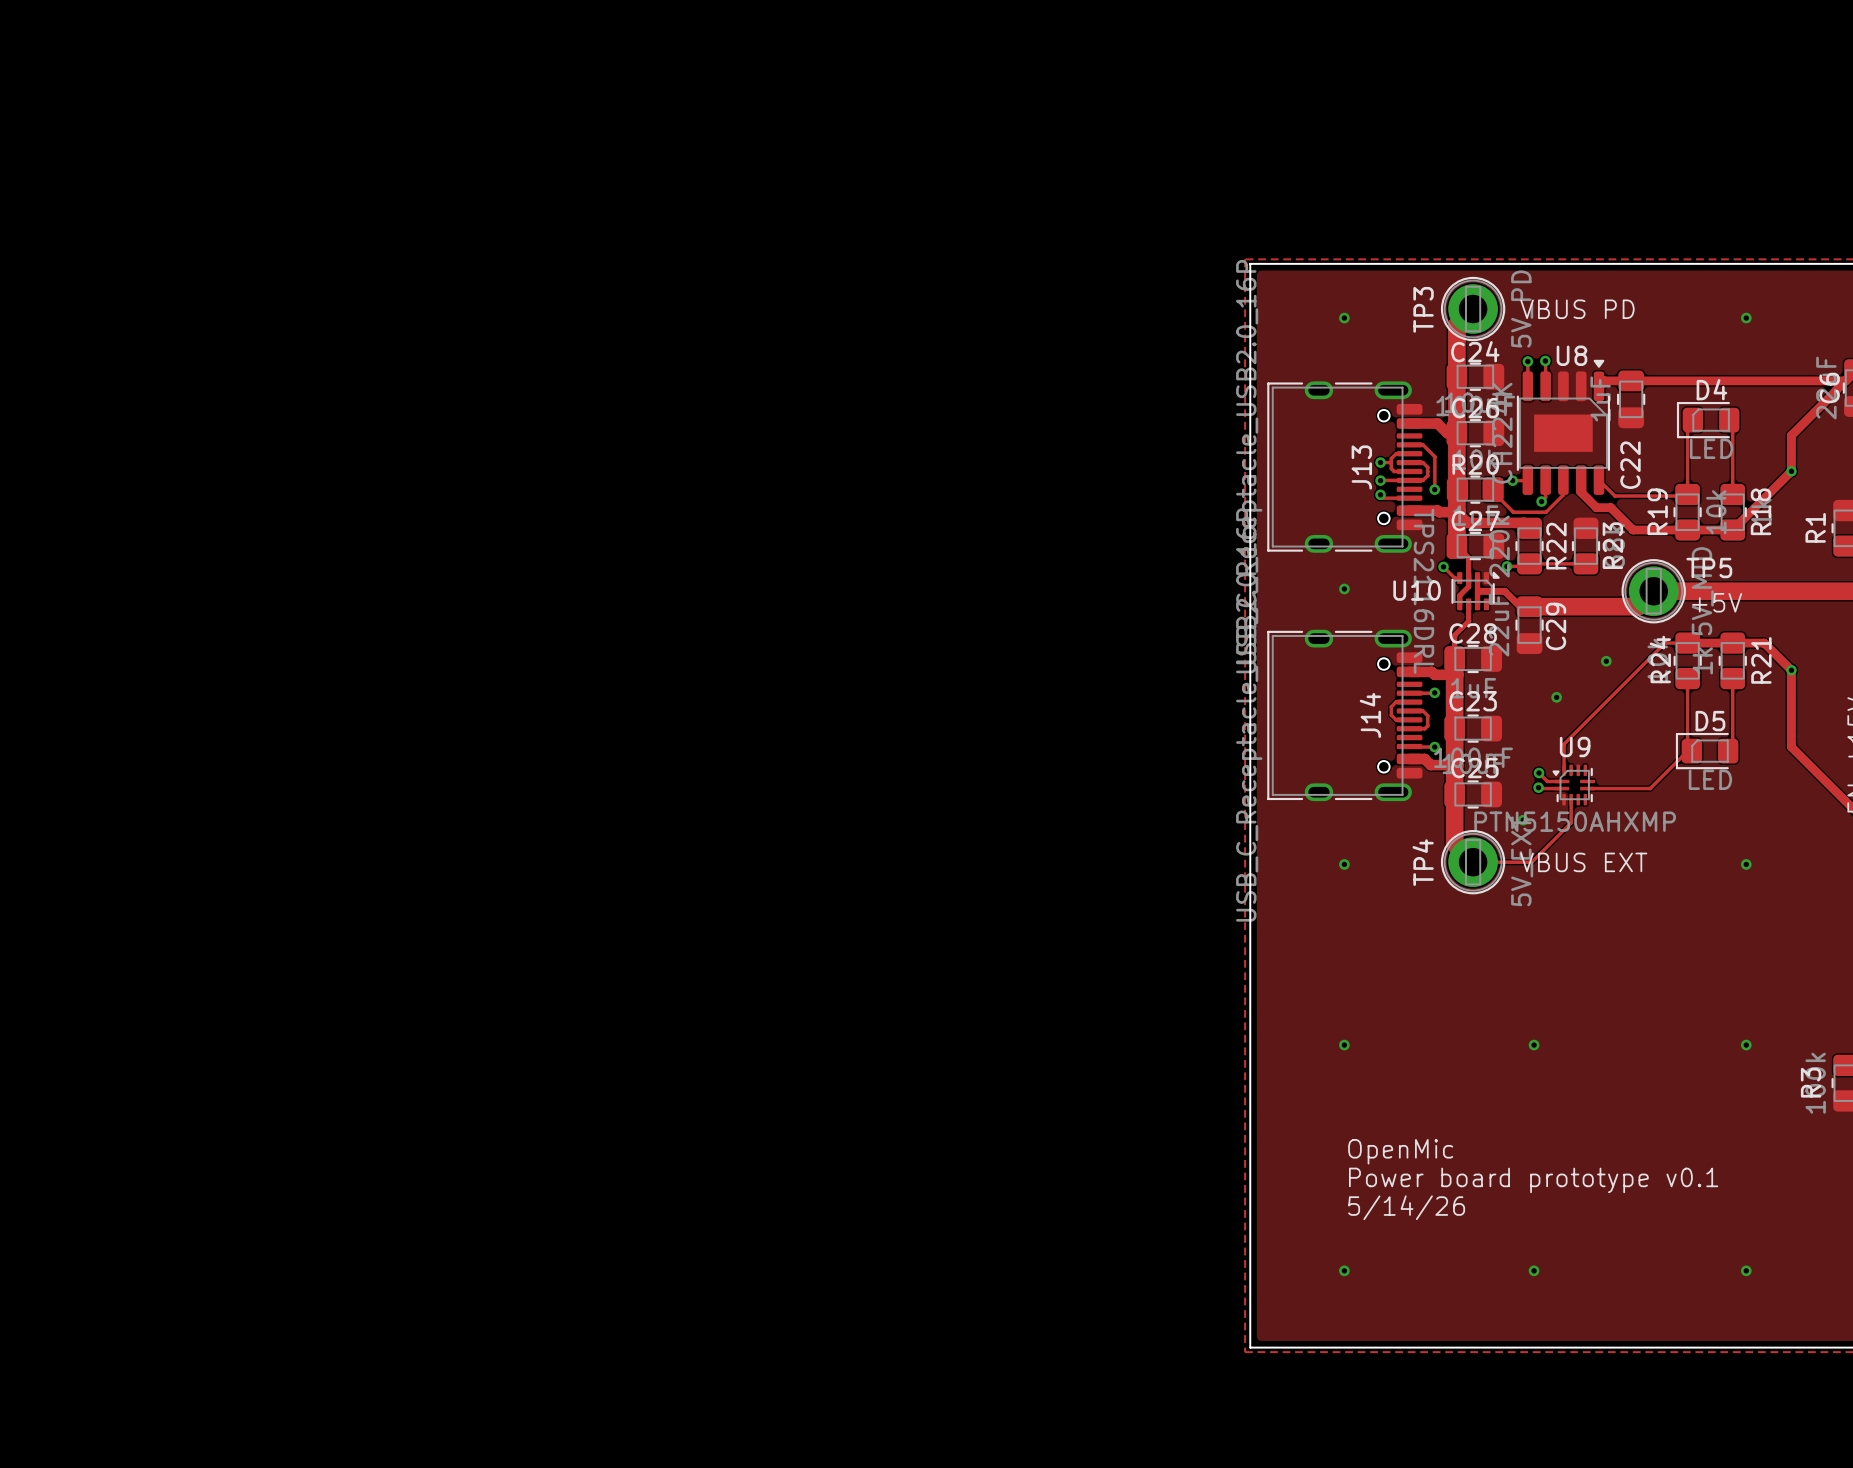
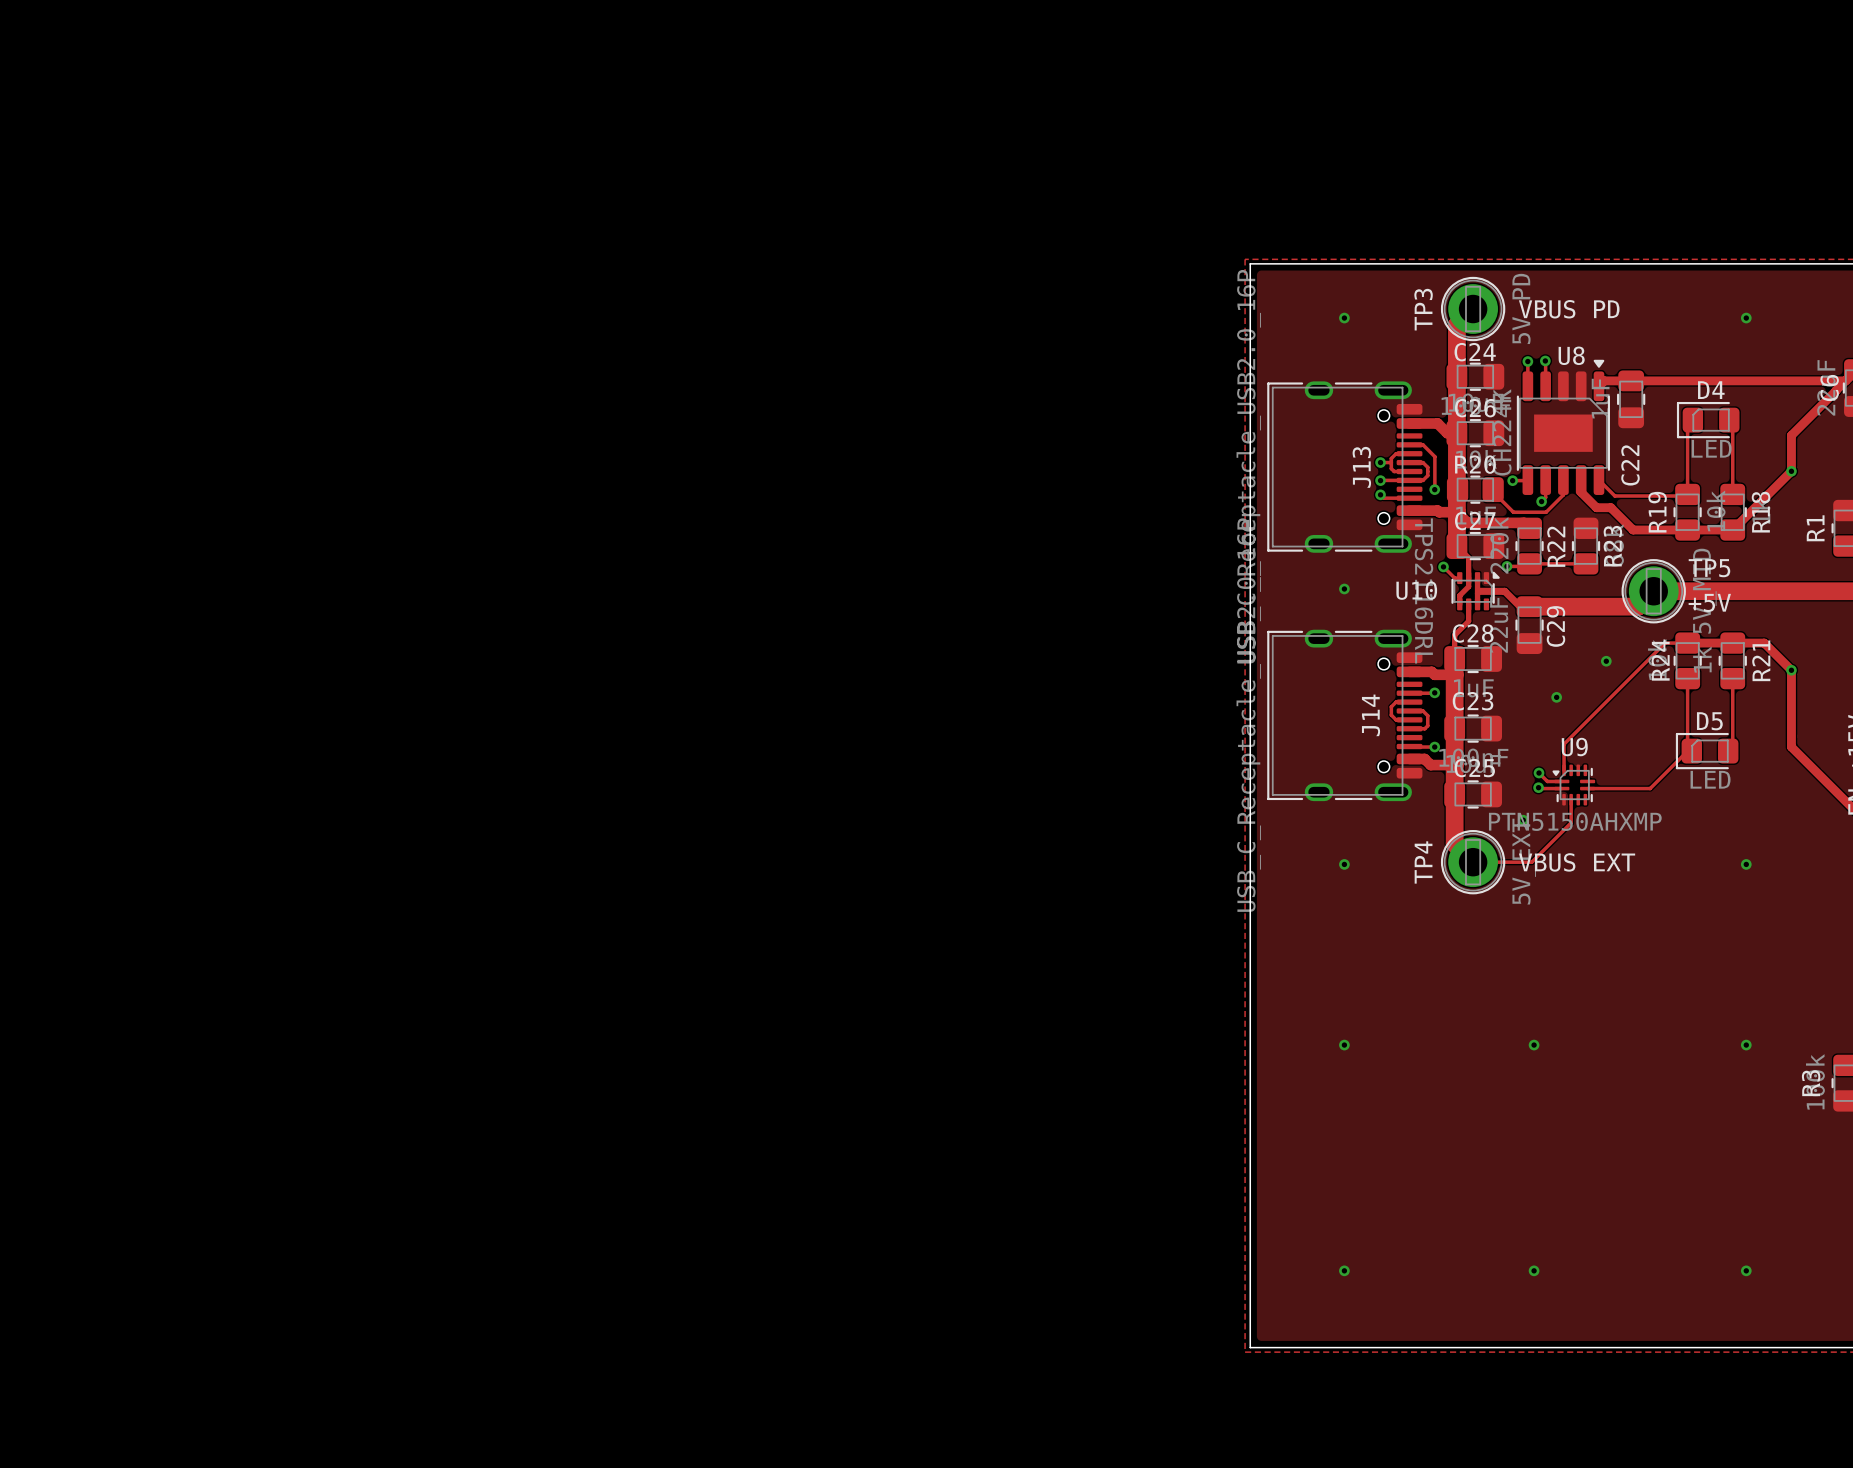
text: OpenMic (1400, 1151) -> none
text: Power board prototype v0.1 (1533, 1180) -> none
text: 5/14/26 (1406, 1207) -> none

